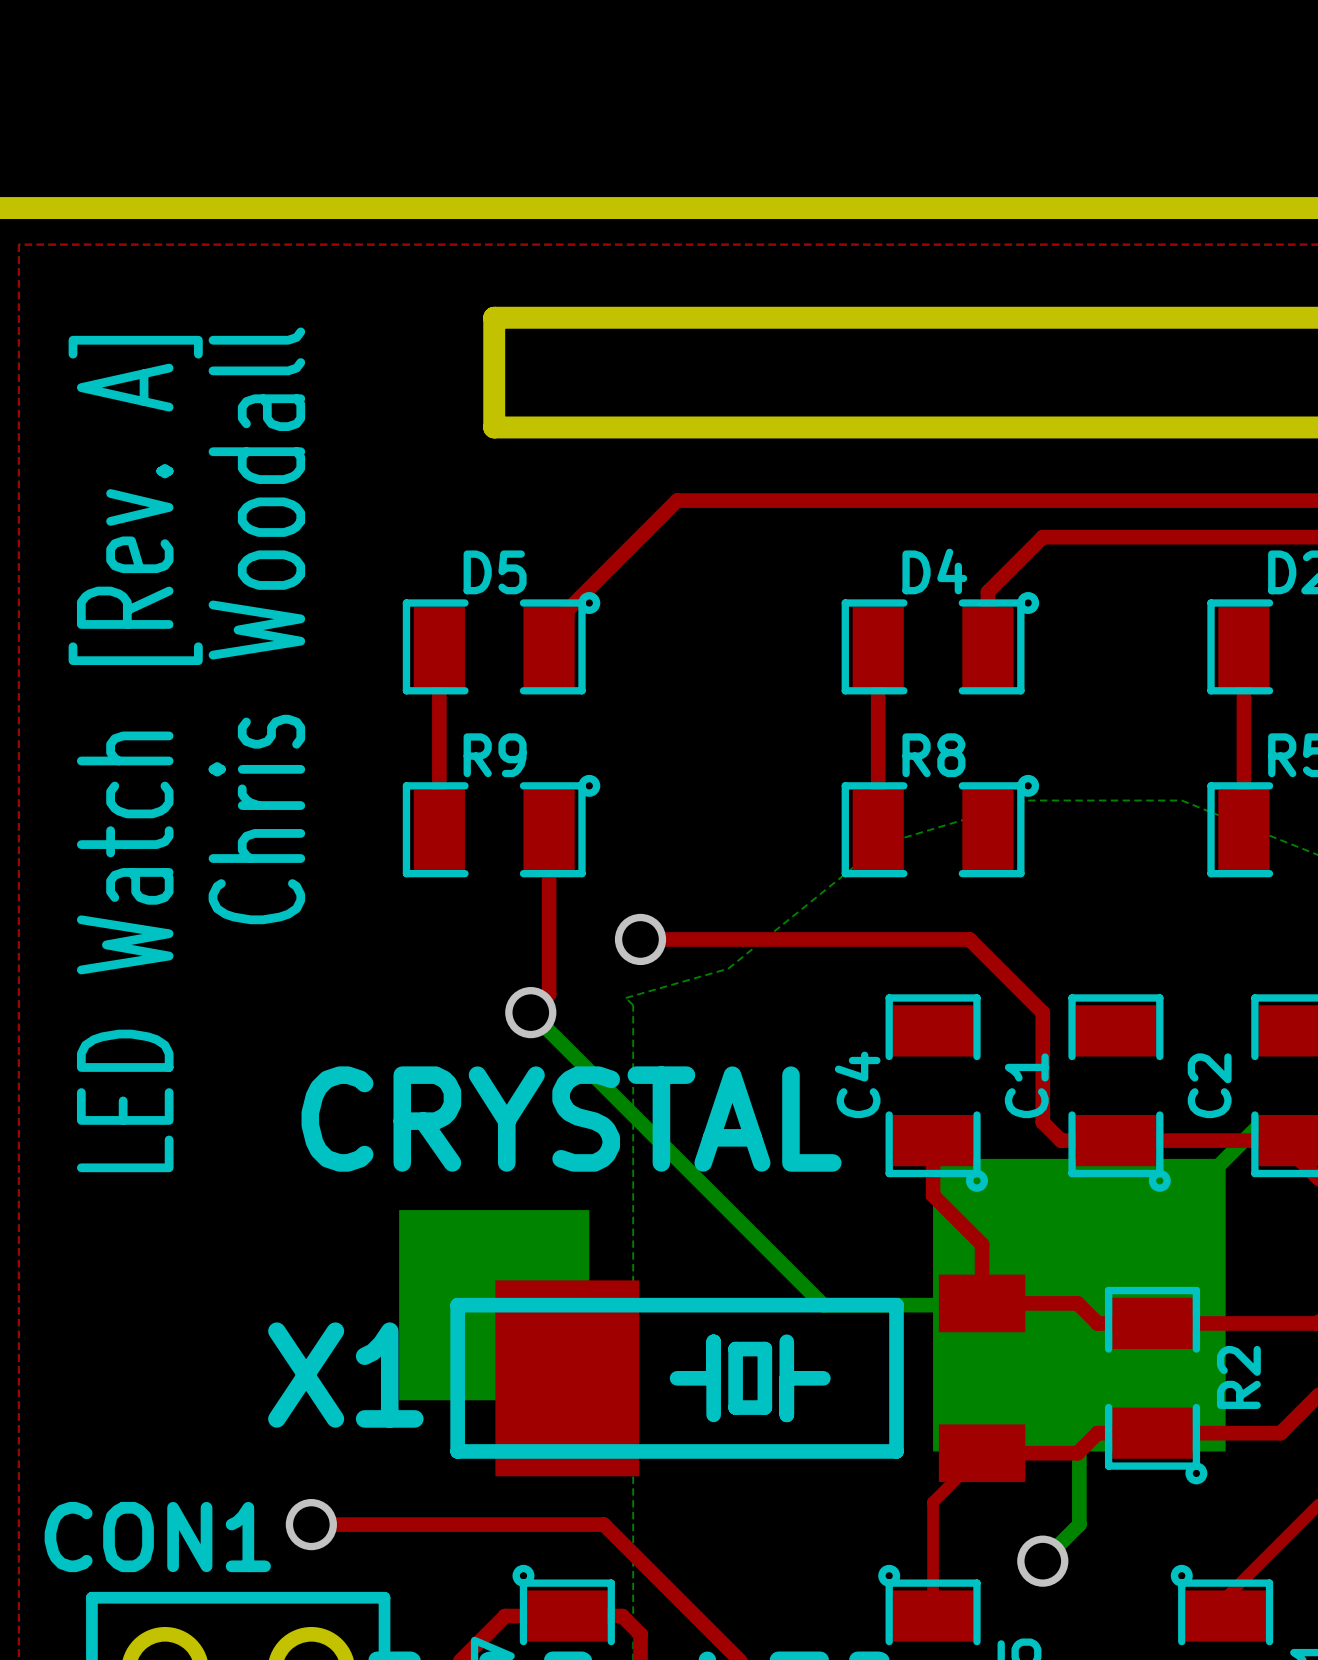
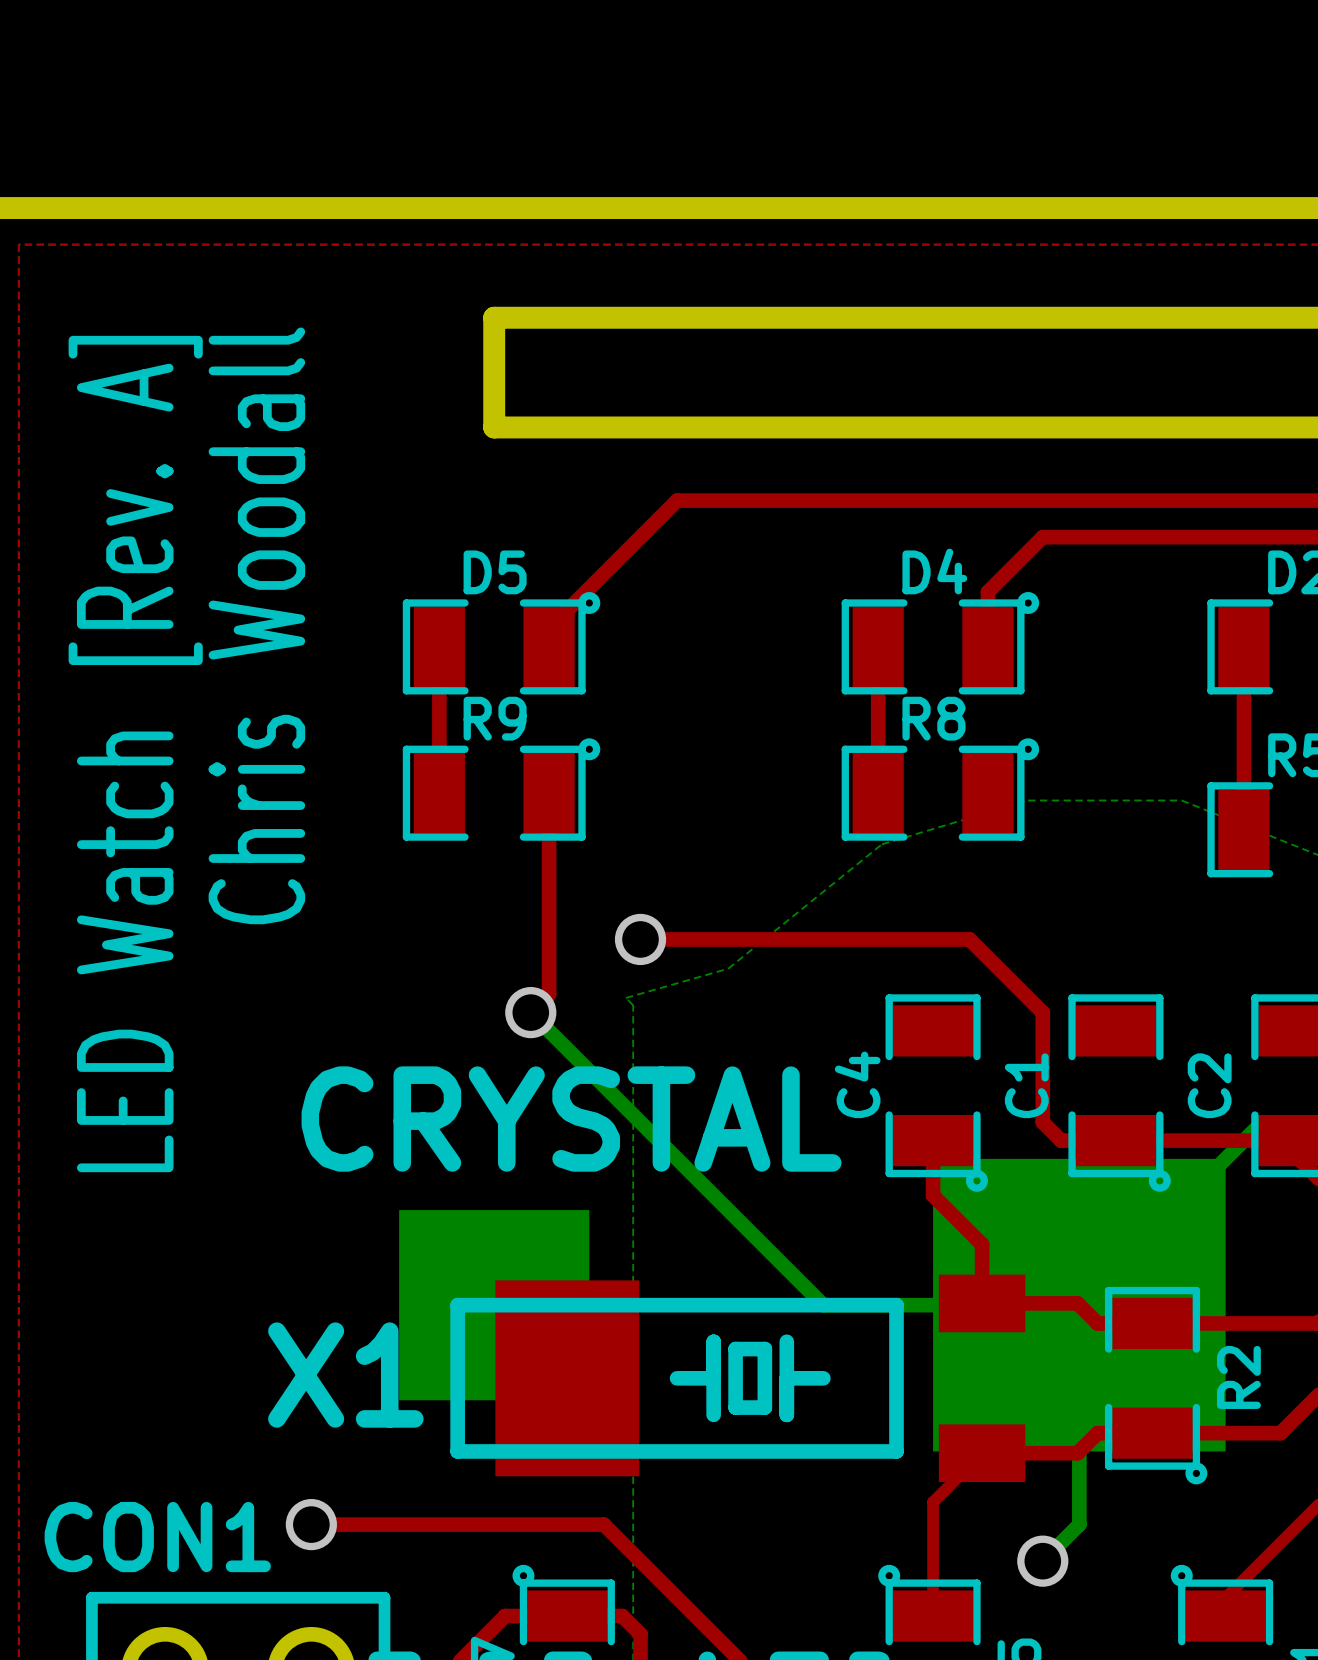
R9 position: (501, 826) -> (501, 789)
R8 position: (940, 826) -> (940, 789)

